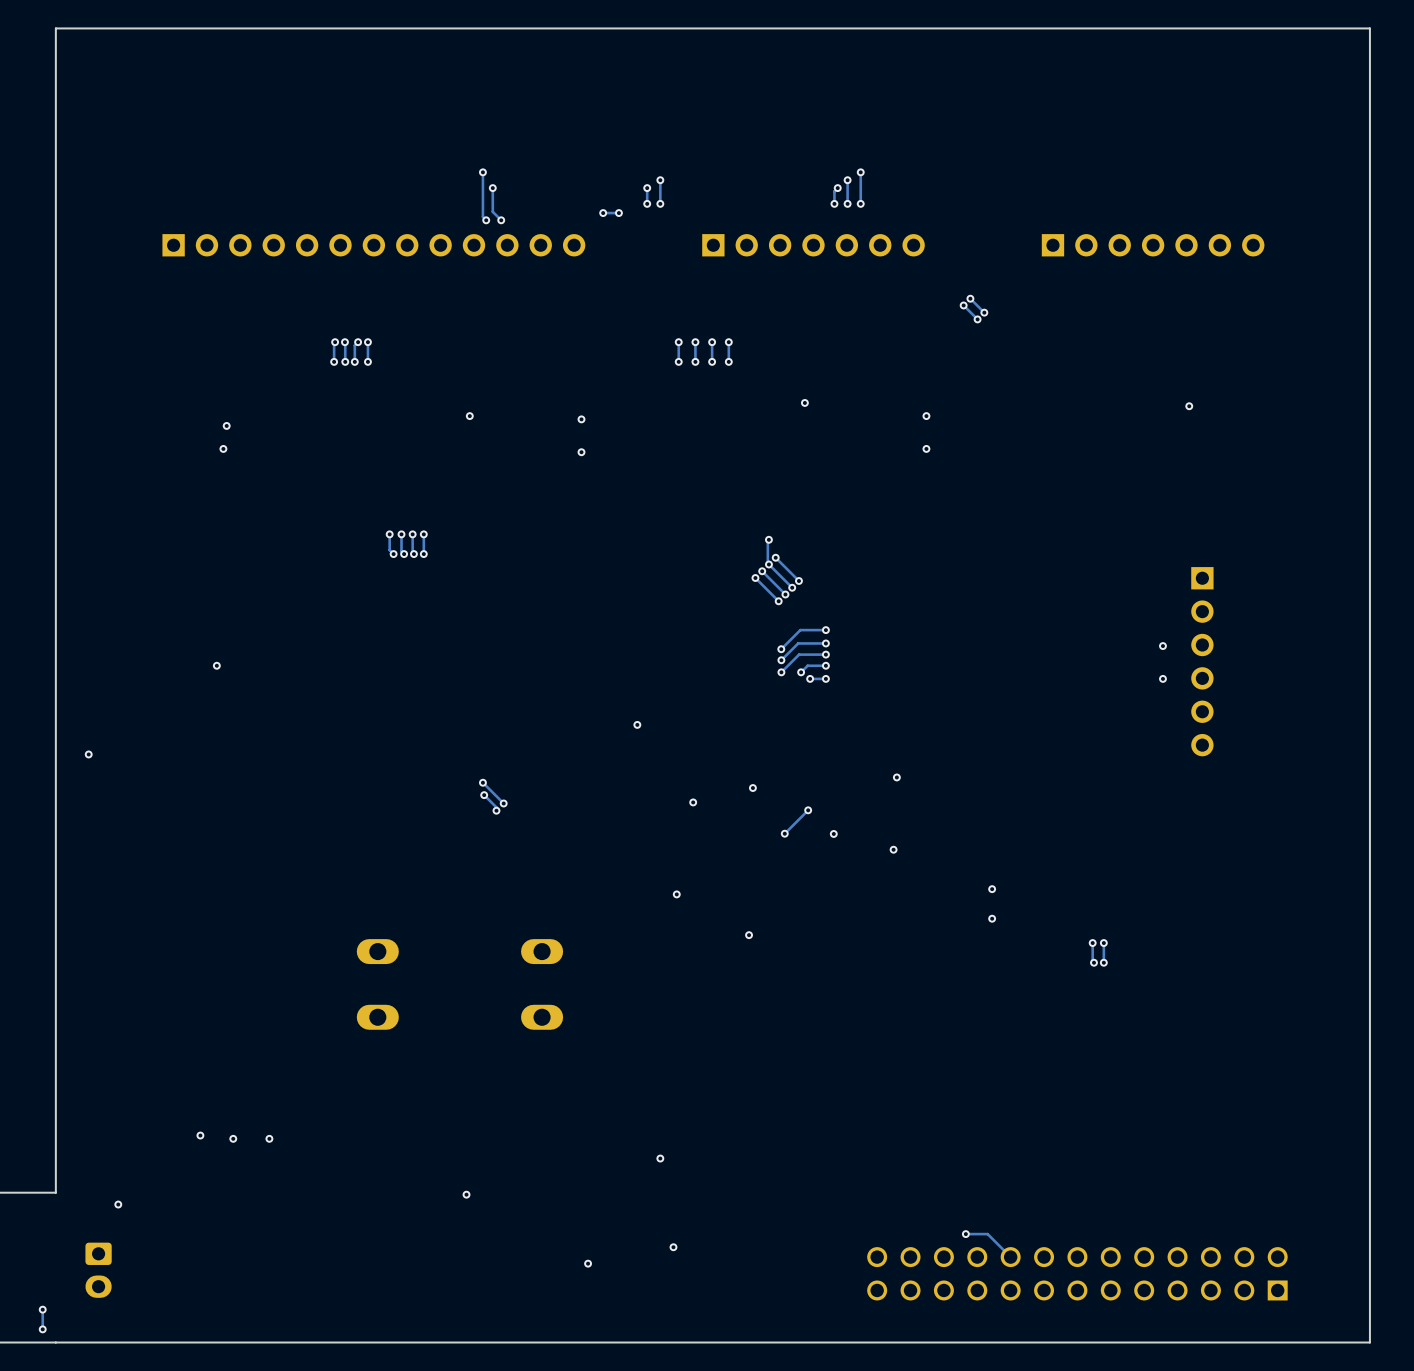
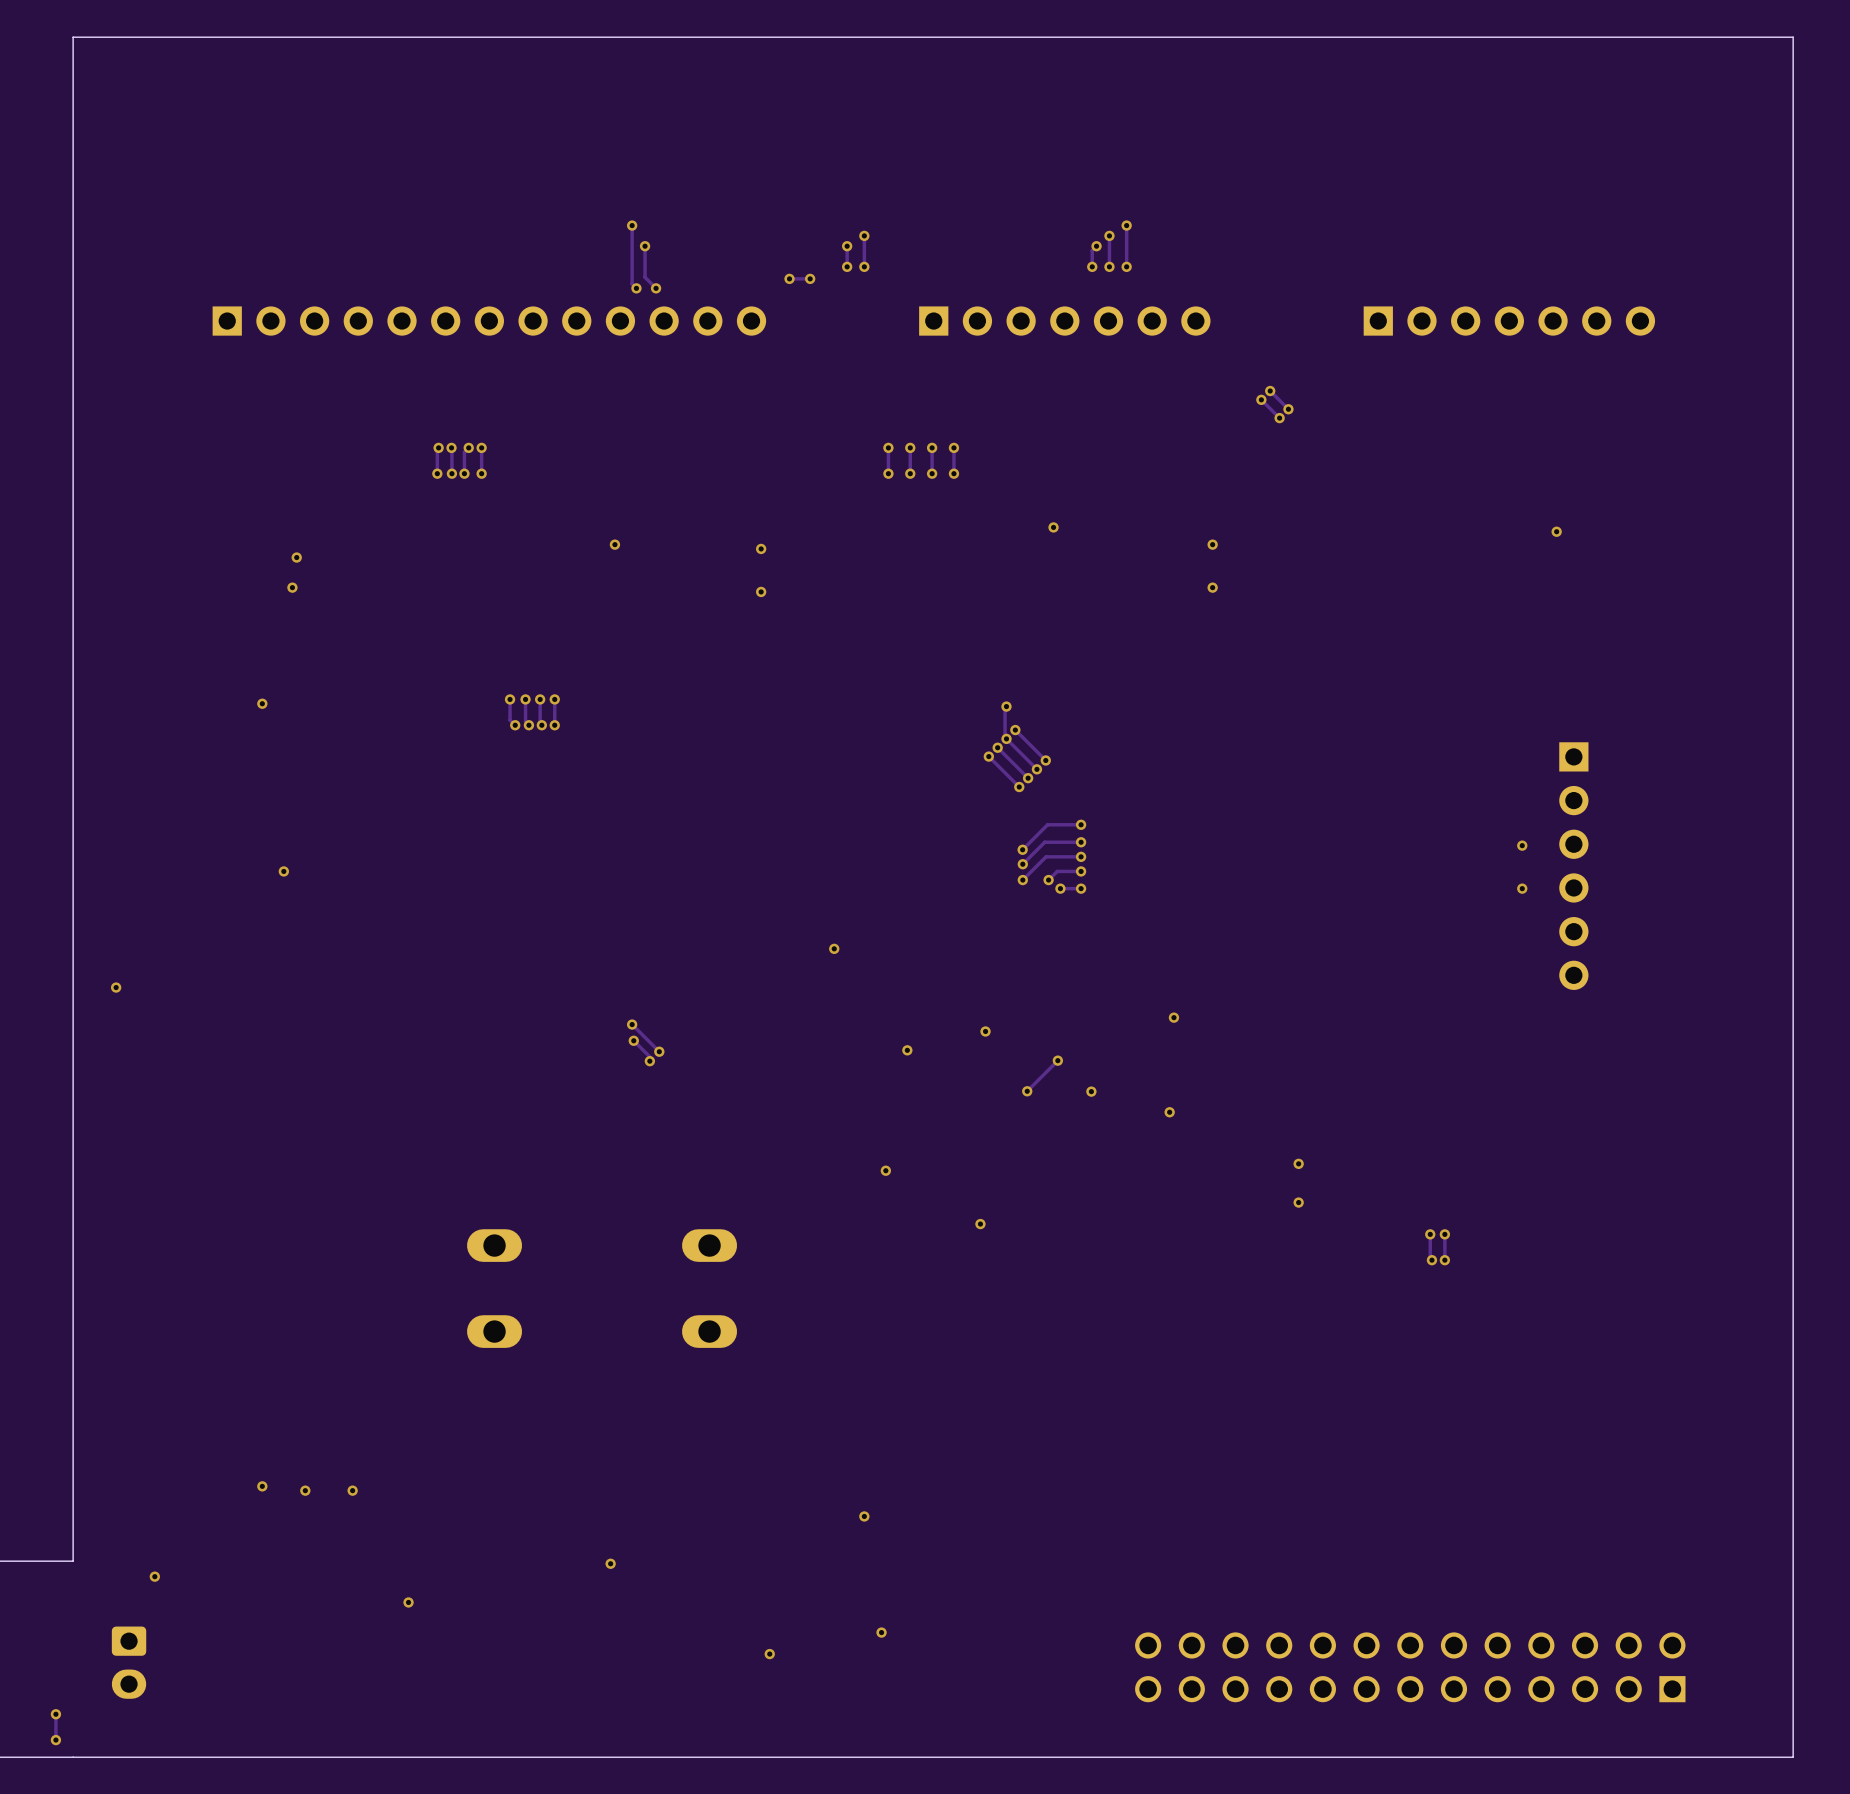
via: none -> (262, 703)
via: none -> (408, 1602)
track: (965, 1234) (987, 1234) (1010, 1257) -> none
via: (965, 1234) -> none

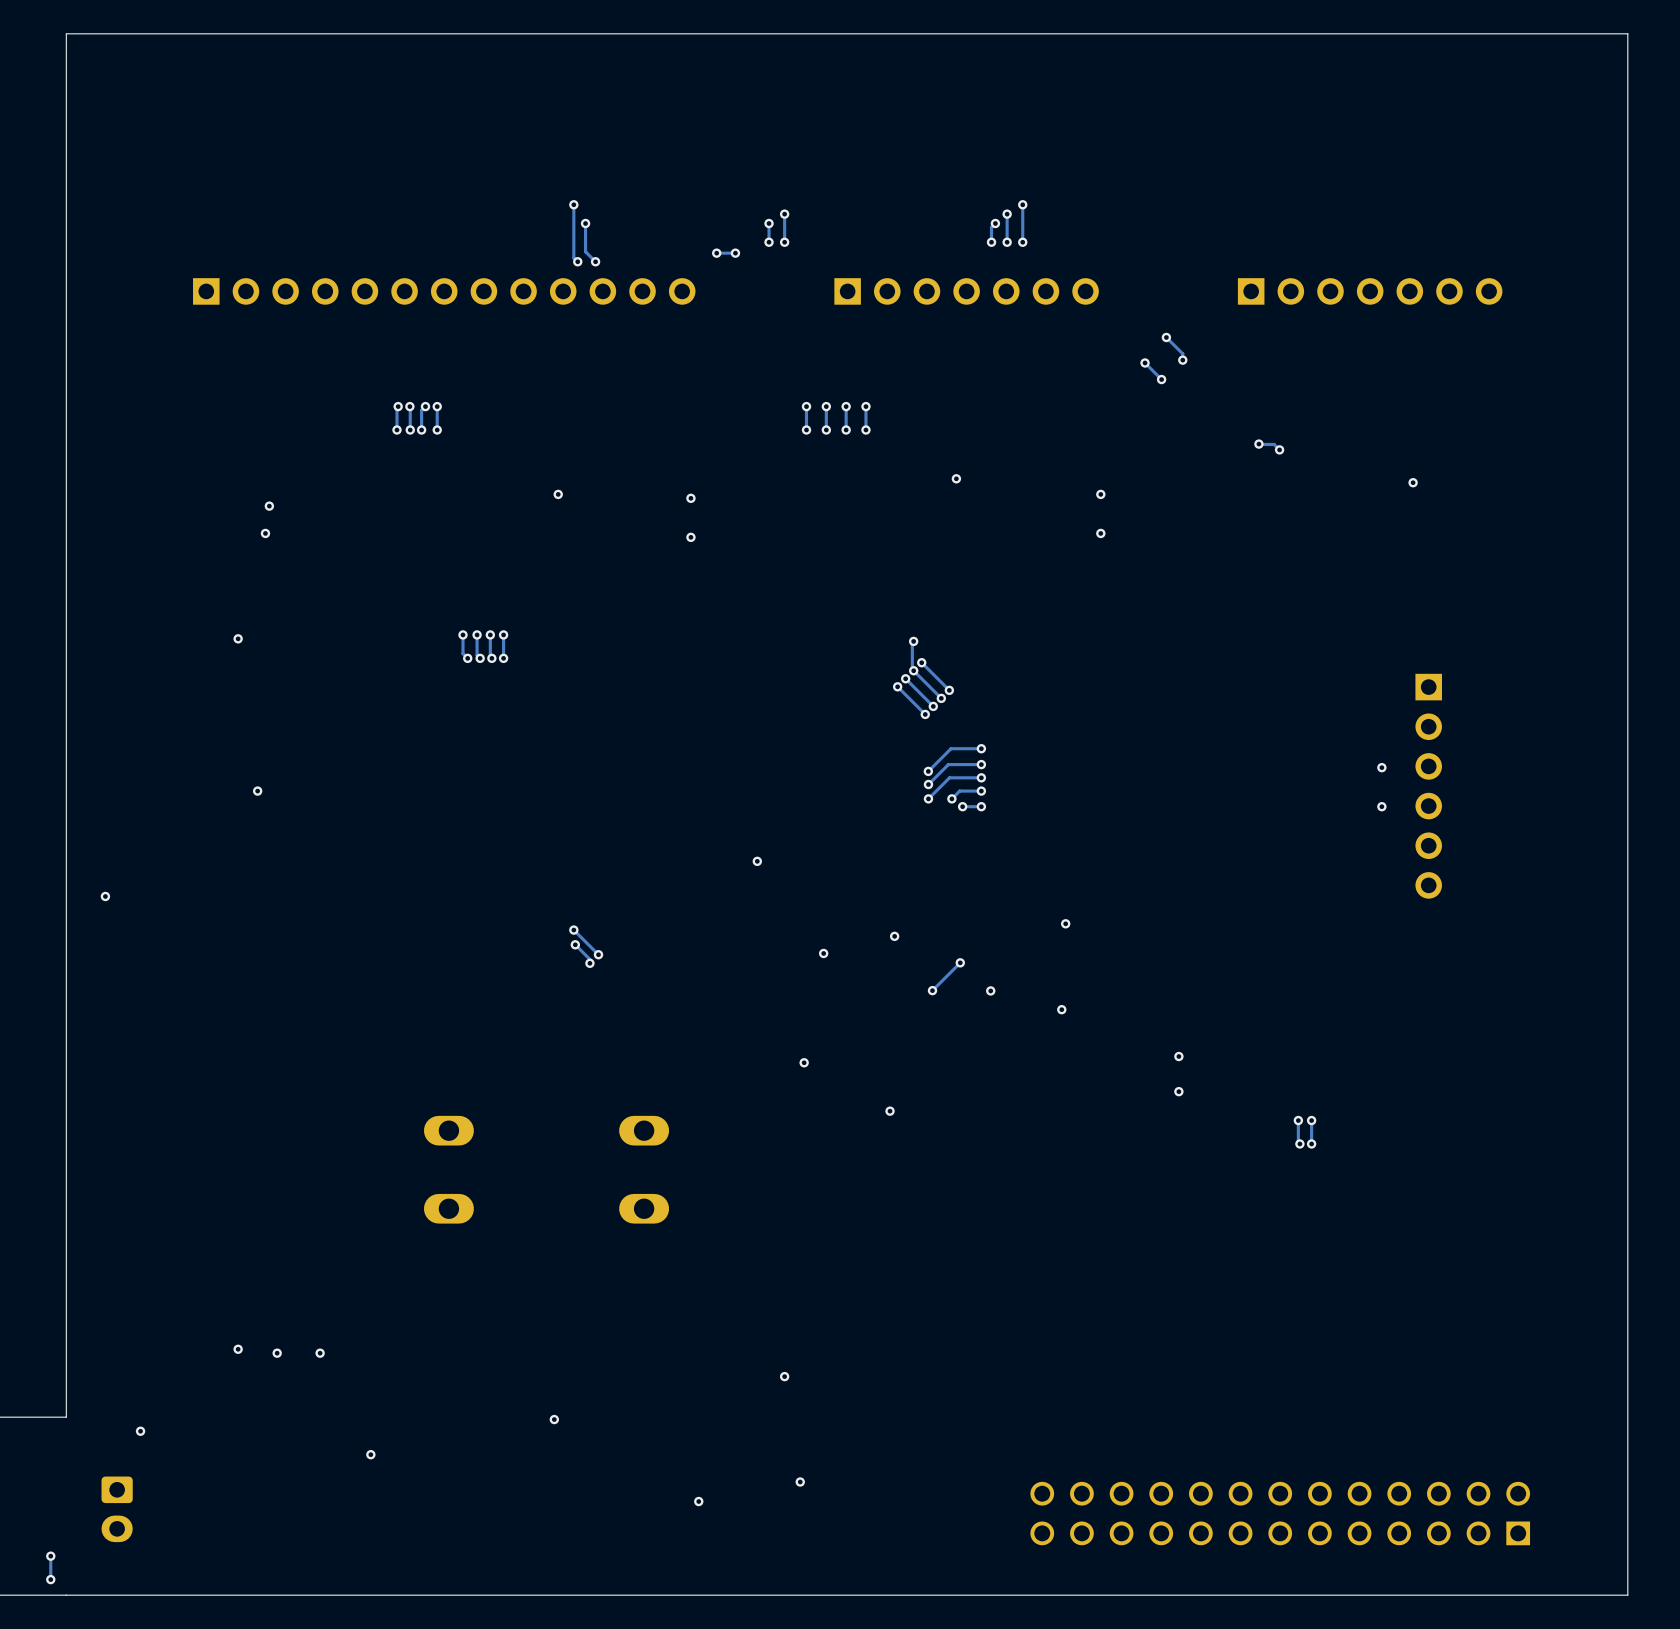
track: none -> (1166, 337) (1182, 353) (1182, 360)
via: none -> (1166, 337)
track: (1270, 391) (1288, 409) -> none
via: (1270, 391) -> none
via: none -> (1182, 360)
via: (1288, 409) -> none
track: none -> (1258, 444) (1274, 444) (1279, 449)
via: none -> (1258, 444)
via: none -> (1279, 449)

